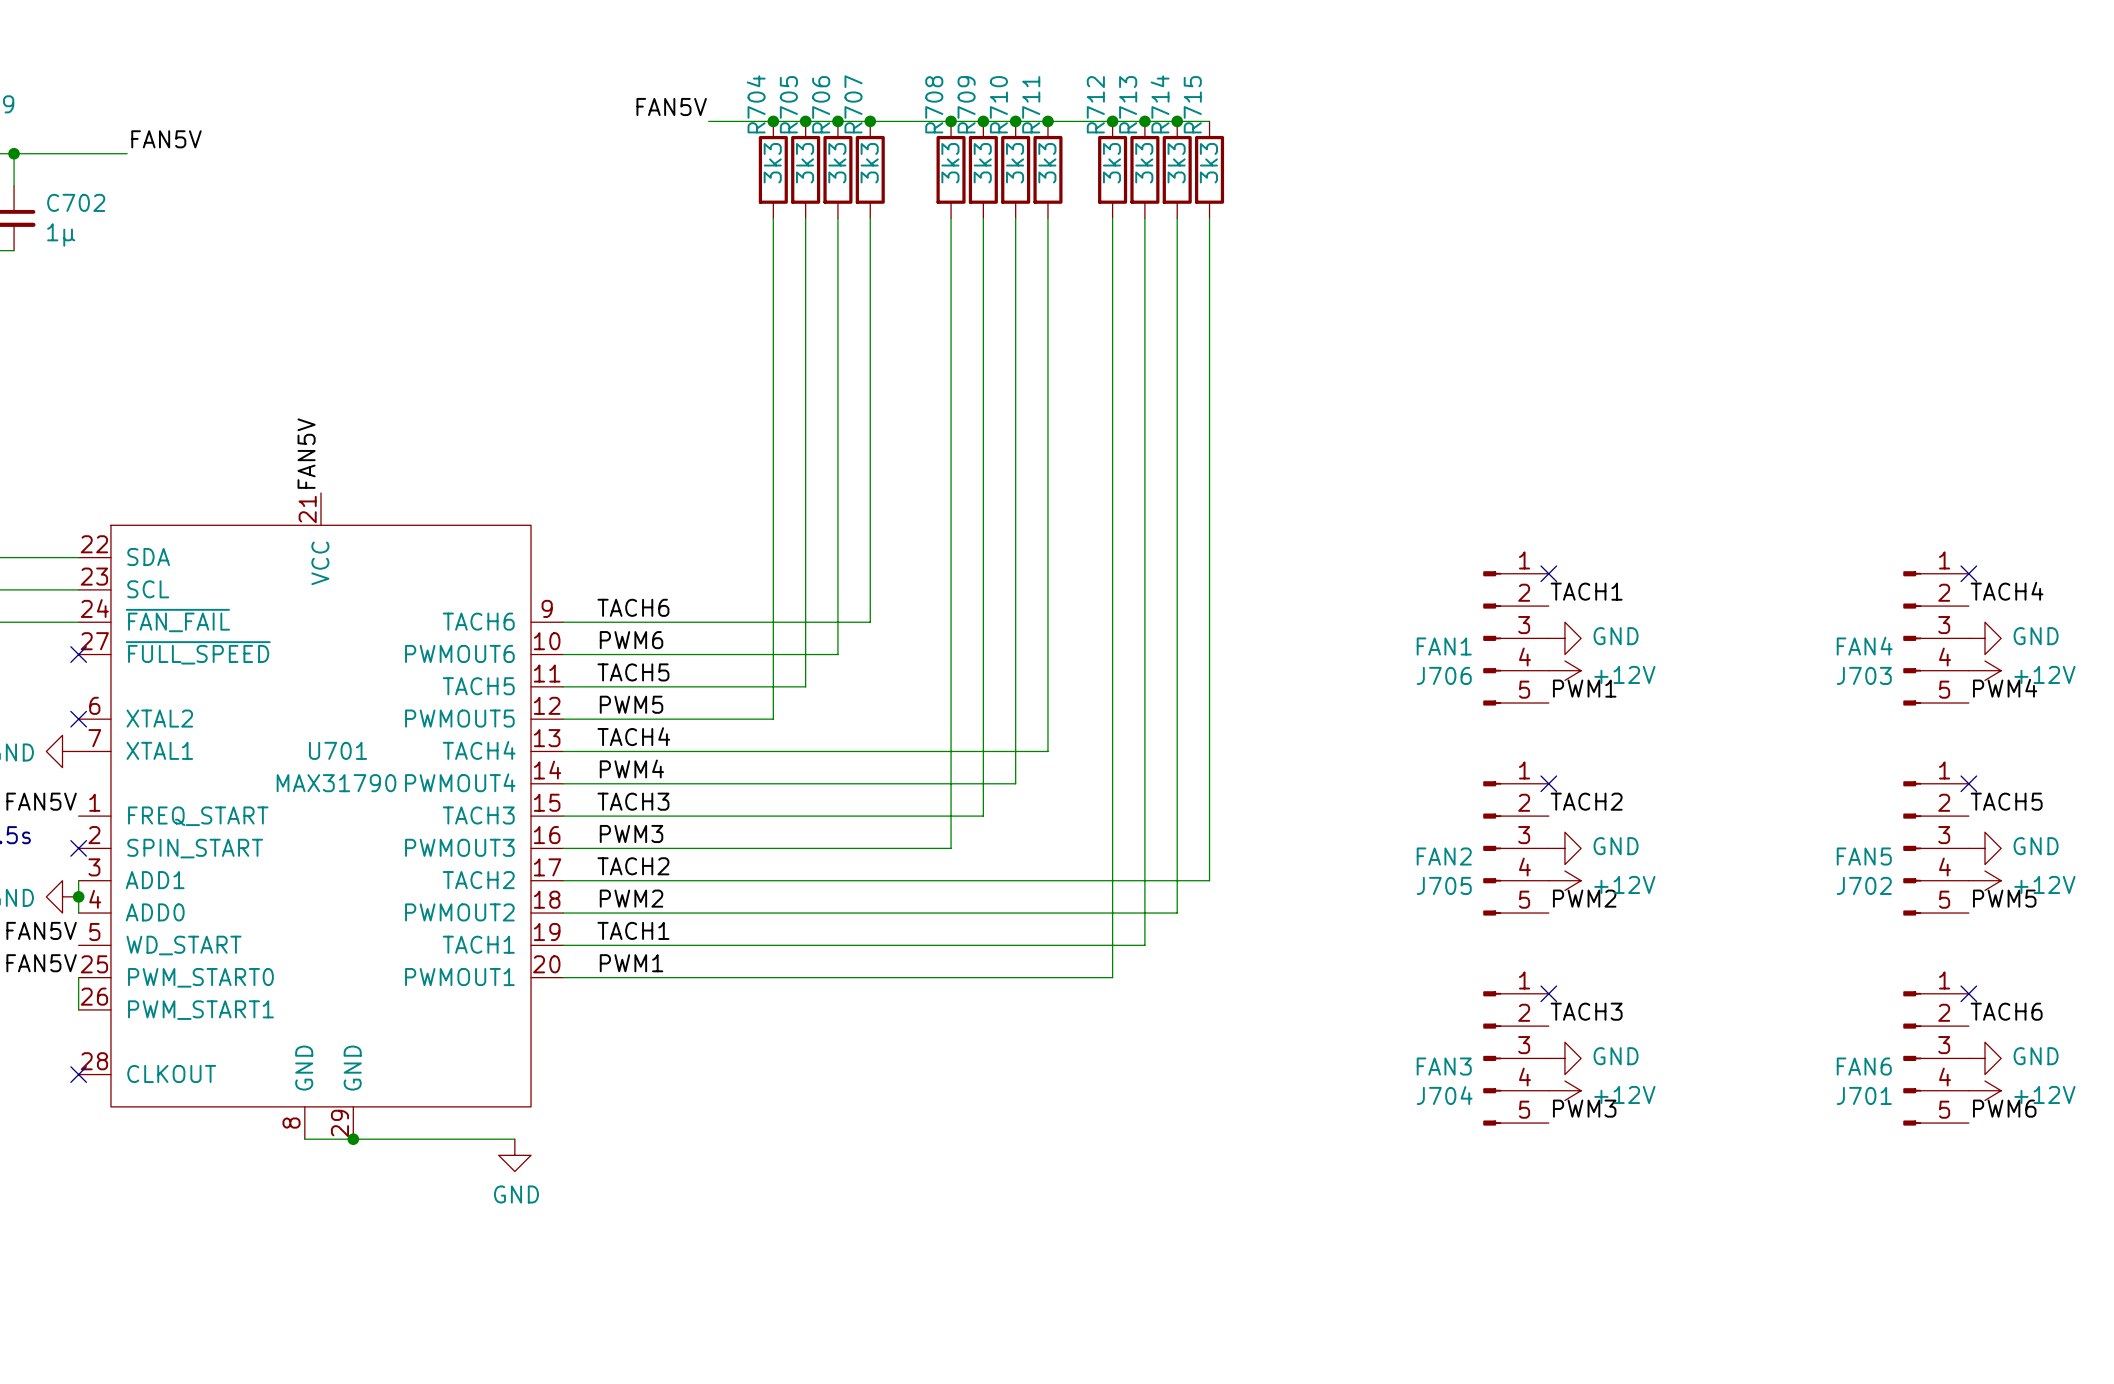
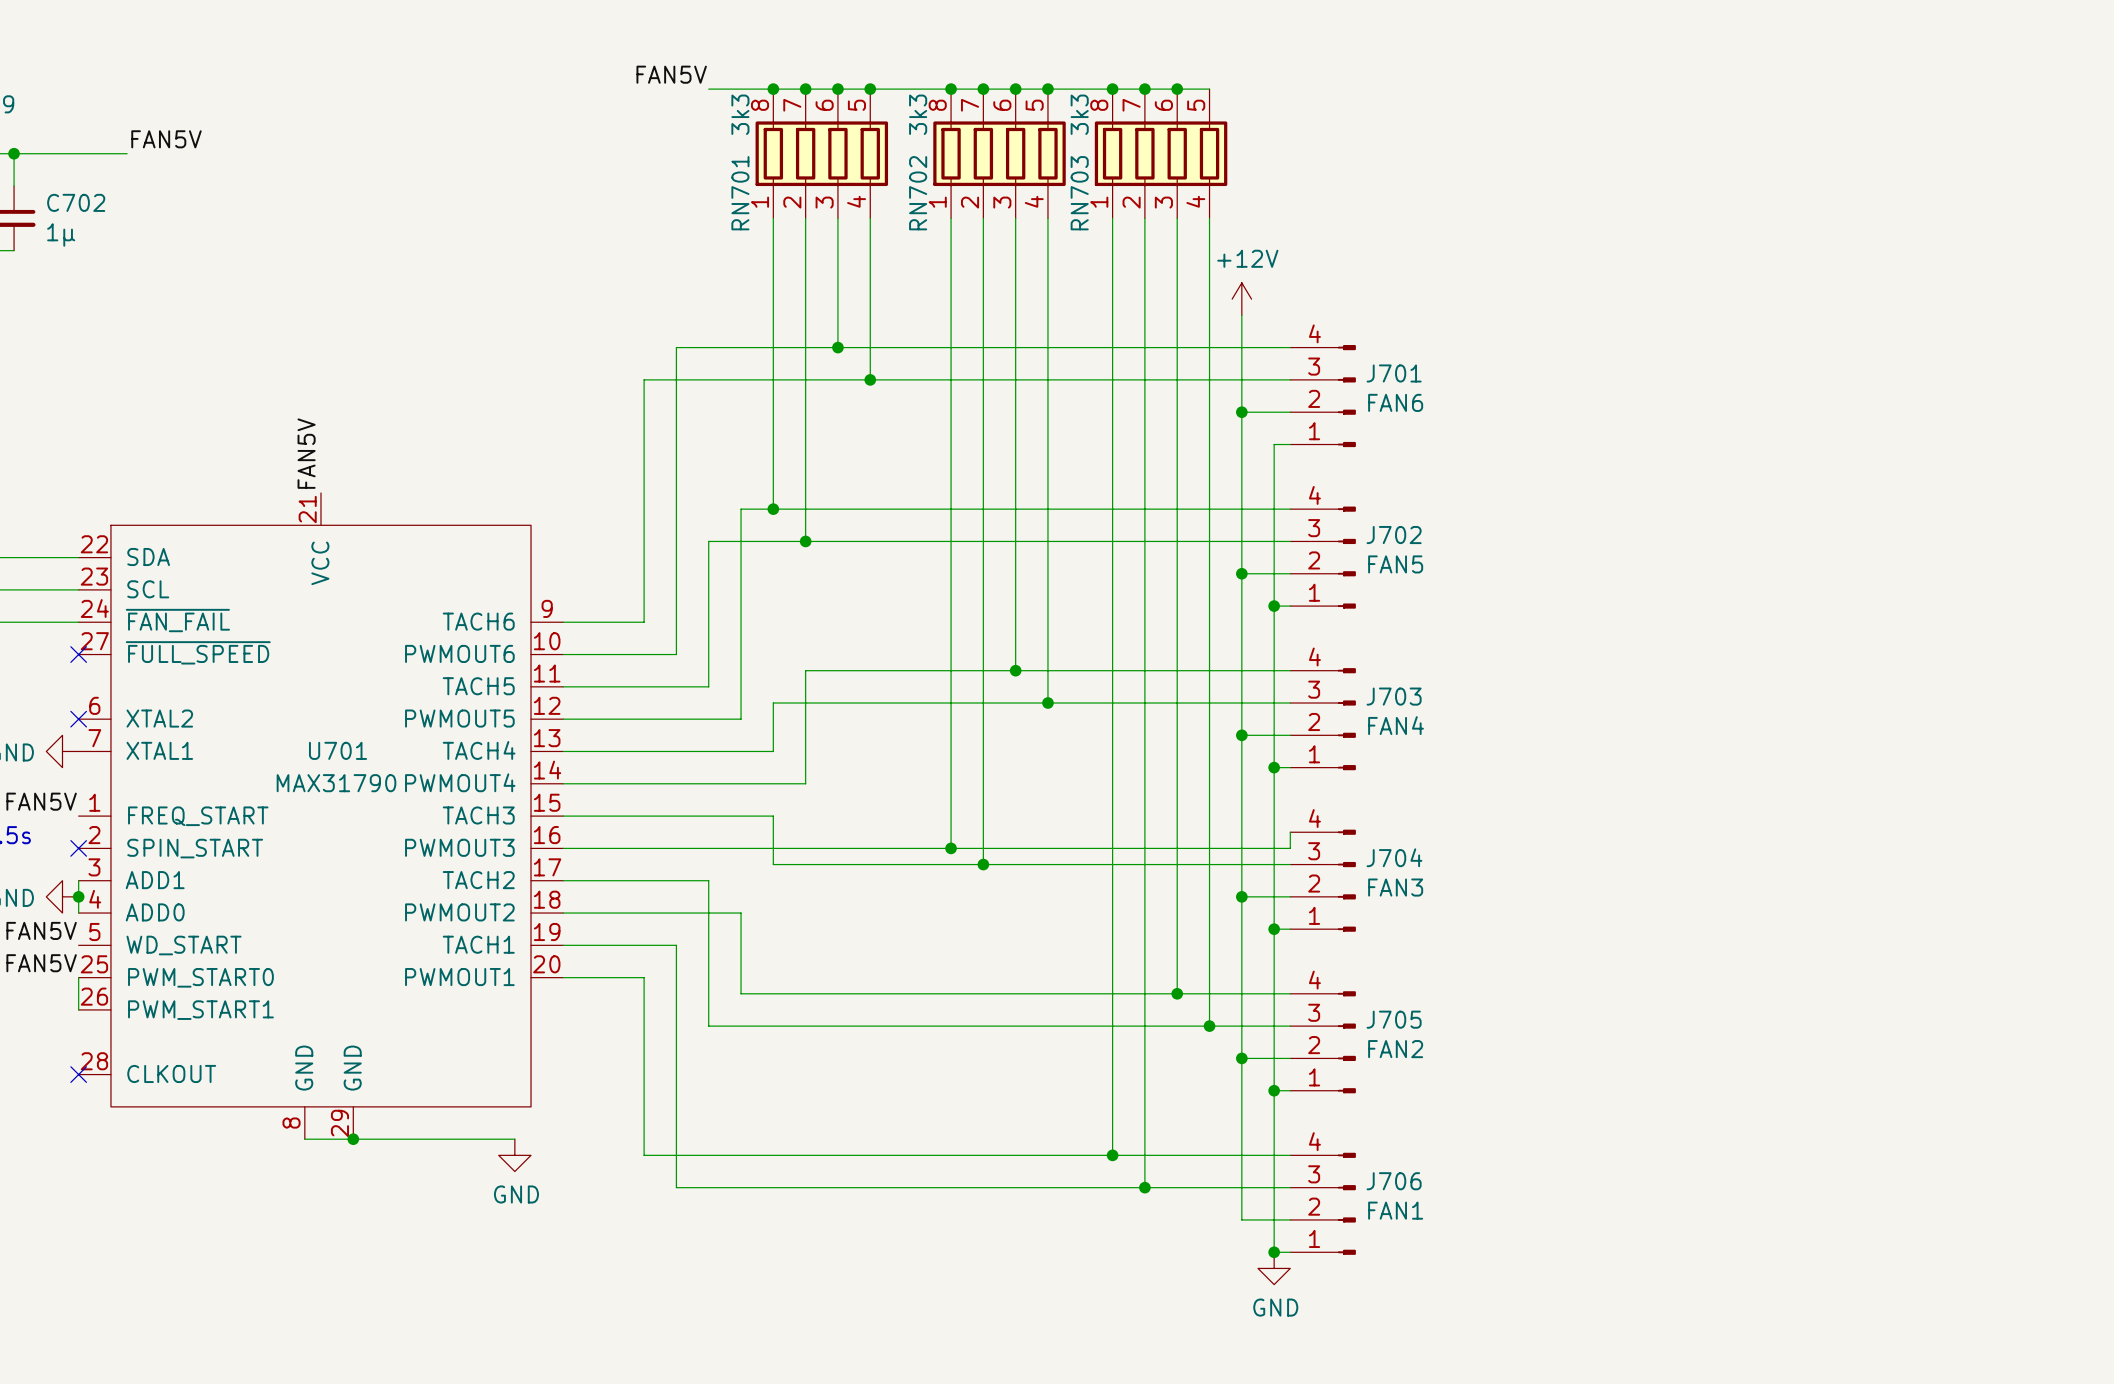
junction: none -> (773, 89)
junction: none -> (805, 89)
junction: none -> (837, 89)
junction: none -> (870, 89)
junction: none -> (951, 89)
junction: none -> (983, 89)
junction: none -> (1015, 89)
junction: none -> (1047, 89)
junction: none -> (1112, 89)
junction: none -> (1144, 89)
junction: none -> (1177, 89)
label position: FAN5V (671, 106) -> FAN5V (671, 74)
wire: (708, 121) (1209, 121) -> (708, 89) (1209, 89)
junction: (773, 121) -> none
junction: (805, 121) -> none
junction: (837, 121) -> none
junction: (870, 121) -> none
junction: (951, 121) -> none
junction: (983, 121) -> none
junction: (1015, 121) -> none
junction: (1047, 121) -> none
junction: (1112, 121) -> none
junction: (1144, 121) -> none
junction: (1177, 121) -> none
RN701: none -> 3k3 (821, 153)
RN702: none -> 3k3 (999, 153)
RN703: none -> 3k3 (1161, 153)
R704: 3k3 (773, 169) -> none
R705: 3k3 (805, 169) -> none
R706: 3k3 (837, 169) -> none
R707: 3k3 (870, 169) -> none
R708: 3k3 (951, 169) -> none
R709: 3k3 (983, 169) -> none
R710: 3k3 (1015, 169) -> none
R711: 3k3 (1047, 169) -> none
R712: 3k3 (1112, 169) -> none
R713: 3k3 (1144, 169) -> none
R714: 3k3 (1177, 169) -> none
R715: 3k3 (1209, 169) -> none
power symbol: none -> +12V (1241, 299)
wire: none -> (1241, 315) (1241, 1219) (1290, 1219)
wire: (837, 347) (837, 654) (676, 654) -> (1290, 347) (676, 347) (676, 654)
junction: none -> (837, 347)
wire: (870, 379) (870, 622) (644, 622) -> (1290, 379) (644, 379) (644, 622)
junction: none -> (870, 379)
wire: none -> (1241, 412) (1290, 412)
junction: none -> (1241, 412)
wire: none -> (1290, 444) (1274, 444) (1274, 1252) (1290, 1252)
wire: (773, 509) (773, 703) -> (1290, 703) (773, 703)
junction: none -> (773, 509)
wire: none -> (1290, 509) (741, 509) (741, 719)
wire: (805, 541) (805, 670) -> (1290, 670) (805, 670)
junction: none -> (805, 541)
wire: none -> (1290, 541) (708, 541) (708, 686)
J706 symbol: [1483, 571, 1549, 706] -> [1290, 1152, 1356, 1255]
J703 symbol: [1903, 571, 1969, 706] -> [1290, 668, 1356, 771]
wire: none -> (1241, 573) (1290, 573)
junction: none -> (1241, 573)
no-connect mark: (1548, 573) -> none
no-connect mark: (1968, 573) -> none
label: TACH1 (1586, 591) -> none
label: TACH4 (2007, 591) -> none
wire: none -> (1274, 606) (1290, 606)
junction: none -> (1274, 606)
label: TACH6 (633, 607) -> none
power symbol: GND (1564, 638) -> none
power symbol: GND (1984, 638) -> none
label: PWM6 (631, 640) -> none
J706 value position: FAN1 (1444, 646) -> FAN1 (1395, 1210)
J703 value position: FAN4 (1864, 646) -> FAN4 (1396, 725)
wire: (1015, 670) (1015, 783) (805, 783) -> none
junction: none -> (1015, 670)
power symbol: +12V (1564, 670) -> none
power symbol: +12V (1984, 670) -> none
label: TACH5 (633, 672) -> none
J706 name position: J706 (1444, 675) -> J706 (1394, 1181)
J703 name position: J703 (1864, 675) -> J703 (1394, 696)
wire: (708, 686) (805, 686) -> (805, 783) (805, 686)
label: PWM1 (1584, 688) -> none
label: PWM4 (2005, 688) -> none
wire: (1047, 703) (1047, 751) (773, 751) -> none
junction: none -> (1047, 703)
label: PWM5 (631, 704) -> none
wire: (741, 719) (773, 719) -> (773, 751) (773, 719)
wire: none -> (1241, 735) (1290, 735)
junction: none -> (1241, 735)
label: TACH4 (633, 736) -> none
wire: none -> (1274, 767) (1290, 767)
junction: none -> (1274, 767)
label: PWM4 (631, 768) -> none
J705 symbol: [1483, 781, 1549, 916] -> [1290, 991, 1356, 1094]
J702 symbol: [1903, 781, 1969, 916] -> [1290, 506, 1356, 609]
no-connect mark: (1548, 783) -> none
no-connect mark: (1968, 783) -> none
label: TACH3 (633, 801) -> none
label: TACH2 (1586, 801) -> none
label: TACH5 (2006, 801) -> none
wire: (773, 816) (983, 816) -> (983, 864) (983, 816)
wire: none -> (773, 816) (773, 864) (1290, 864)
wire: none -> (1290, 832) (1290, 848) (951, 848)
label: PWM3 (631, 833) -> none
junction: none -> (951, 848)
power symbol: GND (1564, 848) -> none
power symbol: GND (1984, 848) -> none
J705 value position: FAN2 (1444, 856) -> FAN2 (1395, 1049)
J702 value position: FAN5 (1864, 856) -> FAN5 (1395, 564)
junction: none -> (983, 864)
label: TACH2 (633, 866) -> none
wire: (708, 880) (1209, 880) -> (708, 880) (708, 1026) (1290, 1026)
wire: none -> (1209, 880) (1209, 1026)
power symbol: +12V (1564, 880) -> none
power symbol: +12V (1984, 880) -> none
J705 name position: J705 (1444, 885) -> J705 (1394, 1019)
J702 name position: J702 (1864, 885) -> J702 (1394, 535)
wire: none -> (1241, 896) (1290, 896)
junction: none -> (1241, 896)
label: PWM2 (631, 898) -> none
label: PWM2 (1584, 898) -> none
label: PWM5 (2004, 898) -> none
wire: (741, 913) (1177, 913) -> (741, 913) (741, 993) (1290, 993)
wire: none -> (1177, 913) (1177, 993)
wire: none -> (1274, 929) (1290, 929)
junction: none -> (1274, 929)
label: TACH1 (633, 930) -> none
wire: (676, 945) (1144, 945) -> (676, 945) (676, 1187) (1290, 1187)
wire: none -> (1144, 945) (1144, 1187)
label: PWM1 (631, 963) -> none
wire: (644, 977) (1112, 977) -> (644, 977) (644, 1155) (1290, 1155)
wire: none -> (1112, 977) (1112, 1155)
J704 symbol: [1483, 991, 1549, 1126] -> [1290, 829, 1356, 932]
J701 symbol: [1903, 991, 1969, 1126] -> [1290, 345, 1356, 448]
junction: none -> (1177, 993)
no-connect mark: (1548, 993) -> none
no-connect mark: (1968, 993) -> none
label: TACH3 (1586, 1011) -> none
label: TACH6 (2006, 1011) -> none
junction: none -> (1209, 1026)
wire: none -> (1241, 1058) (1290, 1058)
junction: none -> (1241, 1058)
power symbol: GND (1564, 1058) -> none
power symbol: GND (1984, 1058) -> none
J704 value position: FAN3 (1444, 1066) -> FAN3 (1395, 887)
J701 value position: FAN6 (1864, 1066) -> FAN6 (1395, 402)
wire: none -> (1274, 1090) (1290, 1090)
junction: none -> (1274, 1090)
power symbol: +12V (1564, 1090) -> none
power symbol: +12V (1984, 1090) -> none
J704 name position: J704 (1444, 1095) -> J704 (1394, 857)
J701 name position: J701 (1864, 1095) -> J701 (1394, 373)
label: PWM3 (1584, 1108) -> none
label: PWM6 (2004, 1108) -> none
junction: none -> (1112, 1155)
junction: none -> (1144, 1187)
junction: none -> (1274, 1252)
power symbol: none -> GND (1274, 1268)

